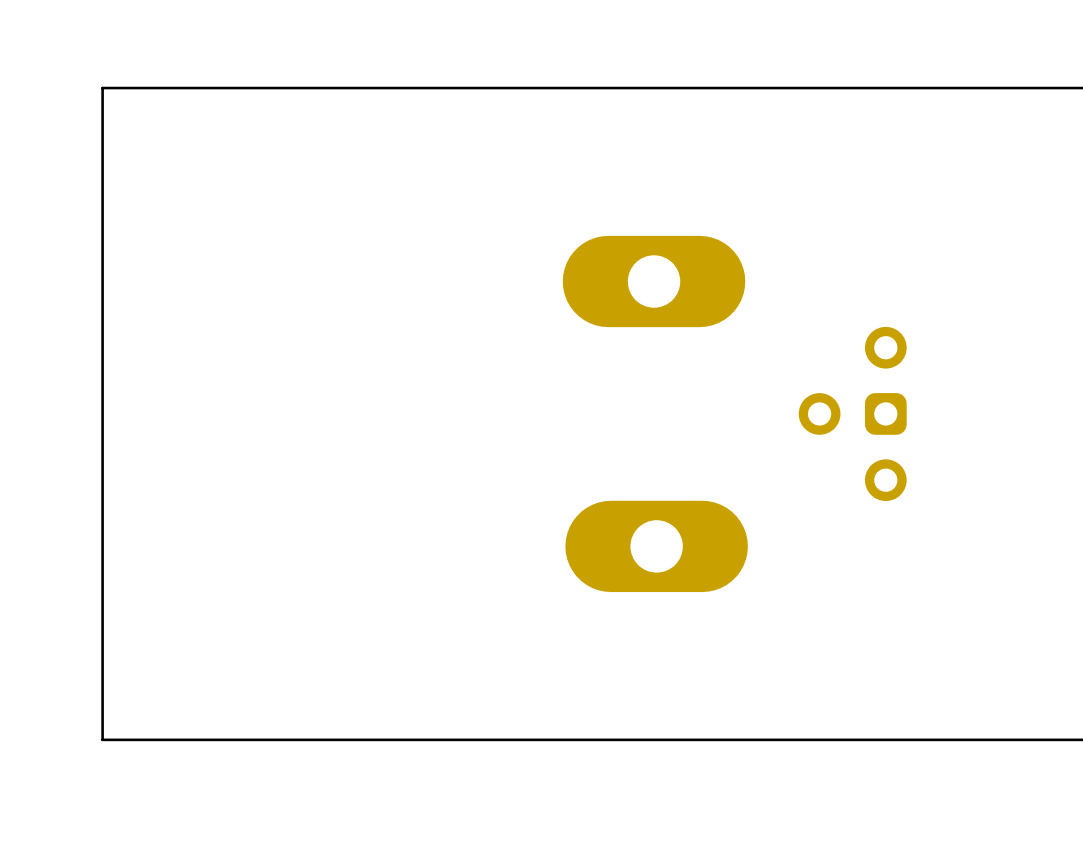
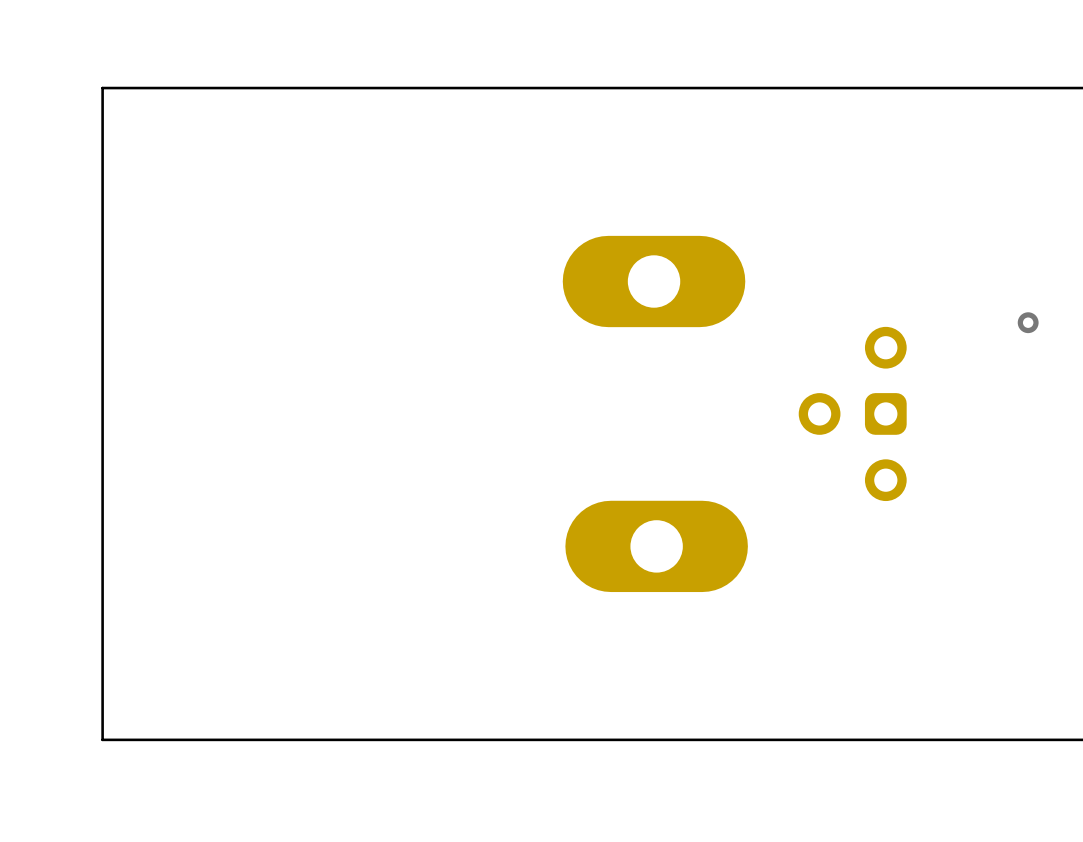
via: none -> (1028, 322)

